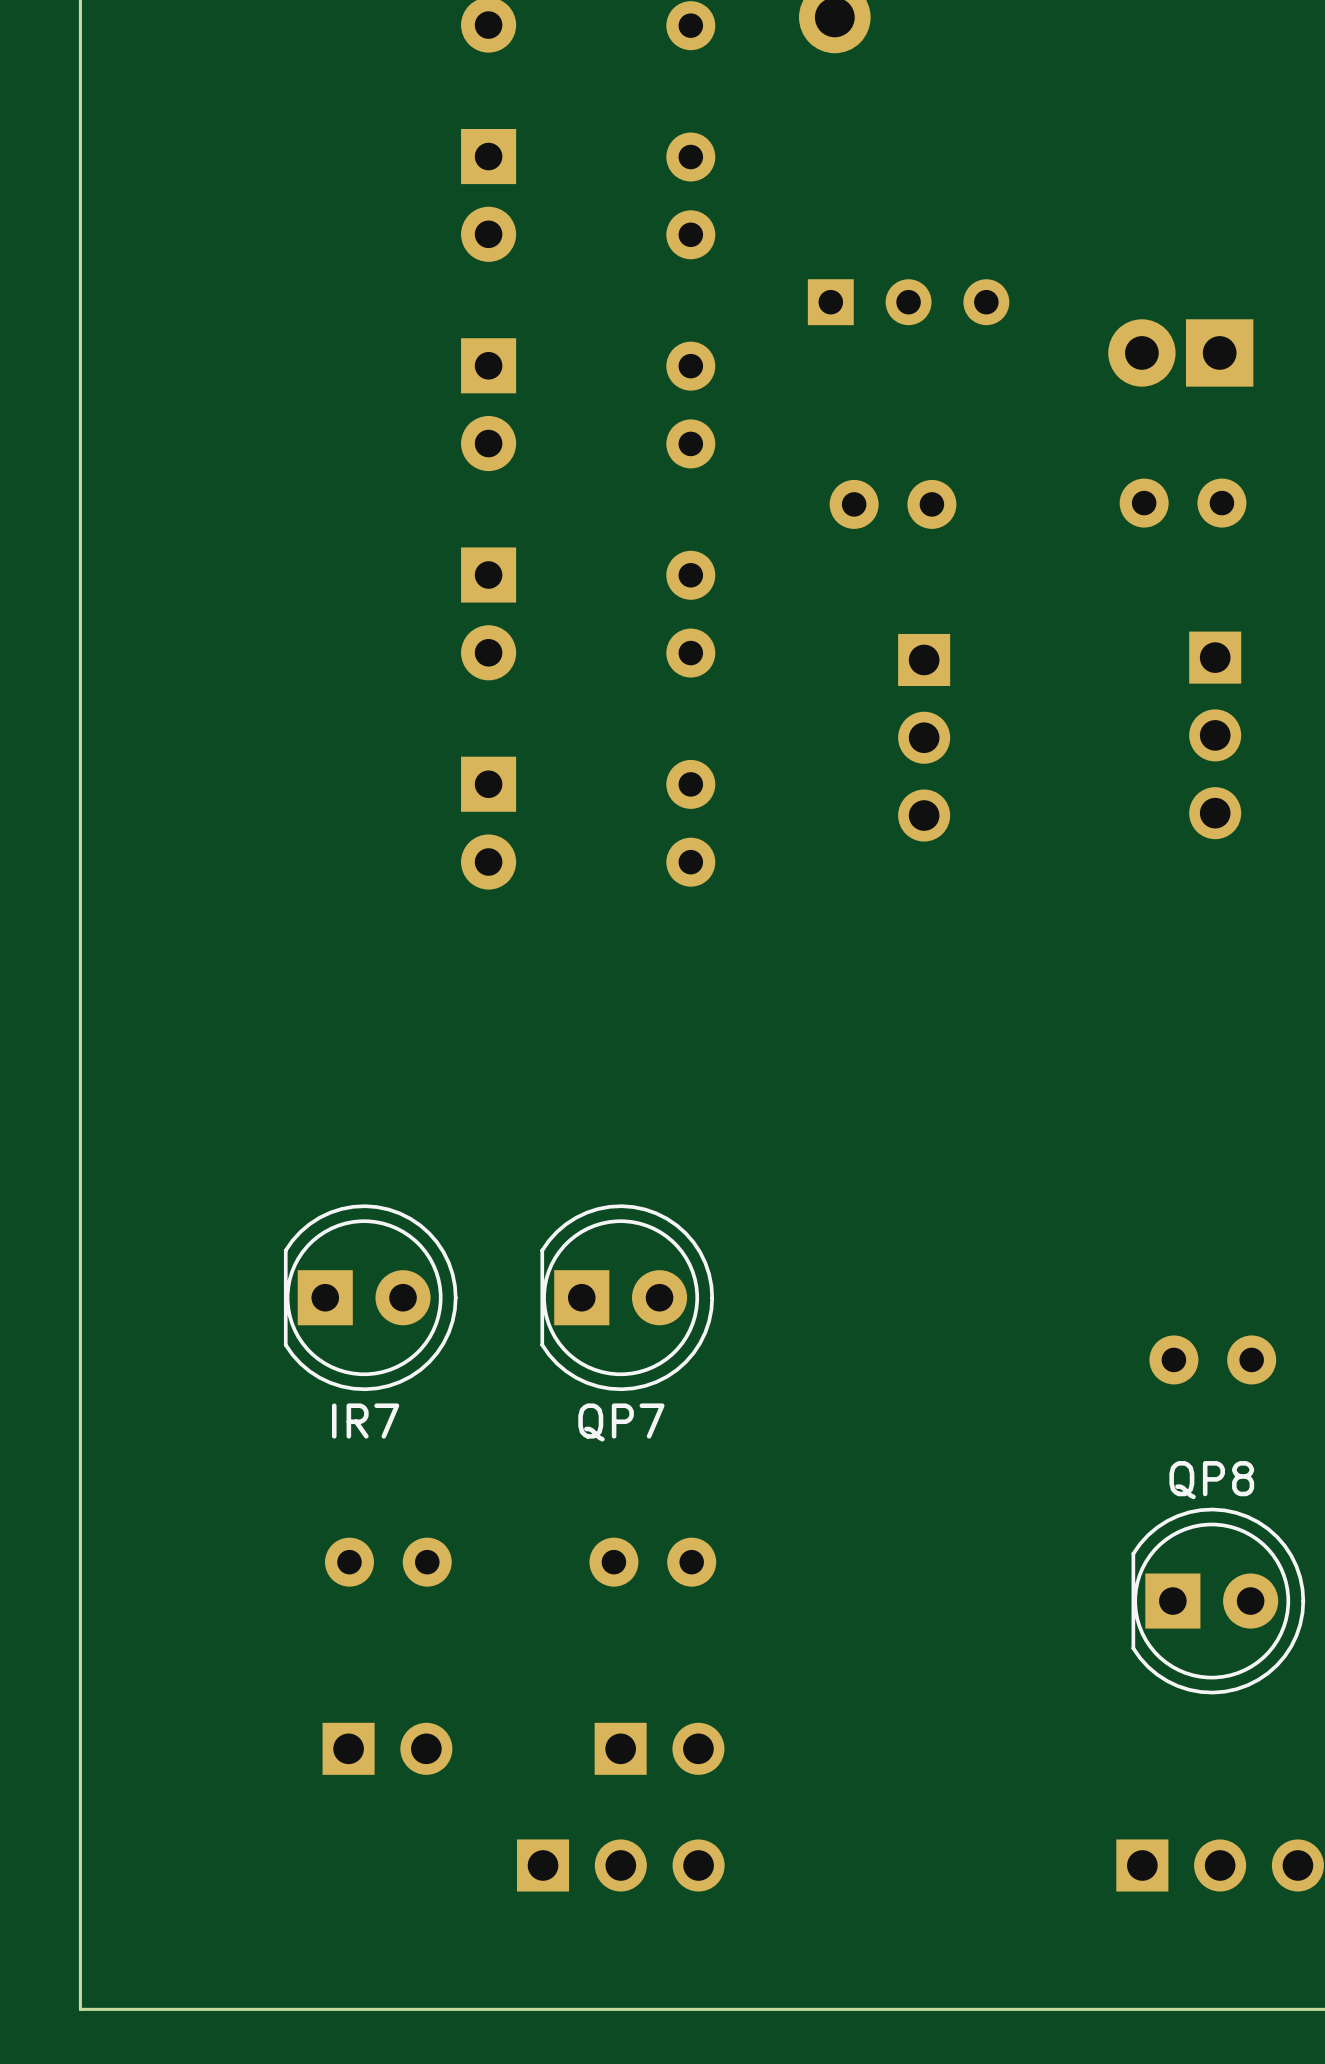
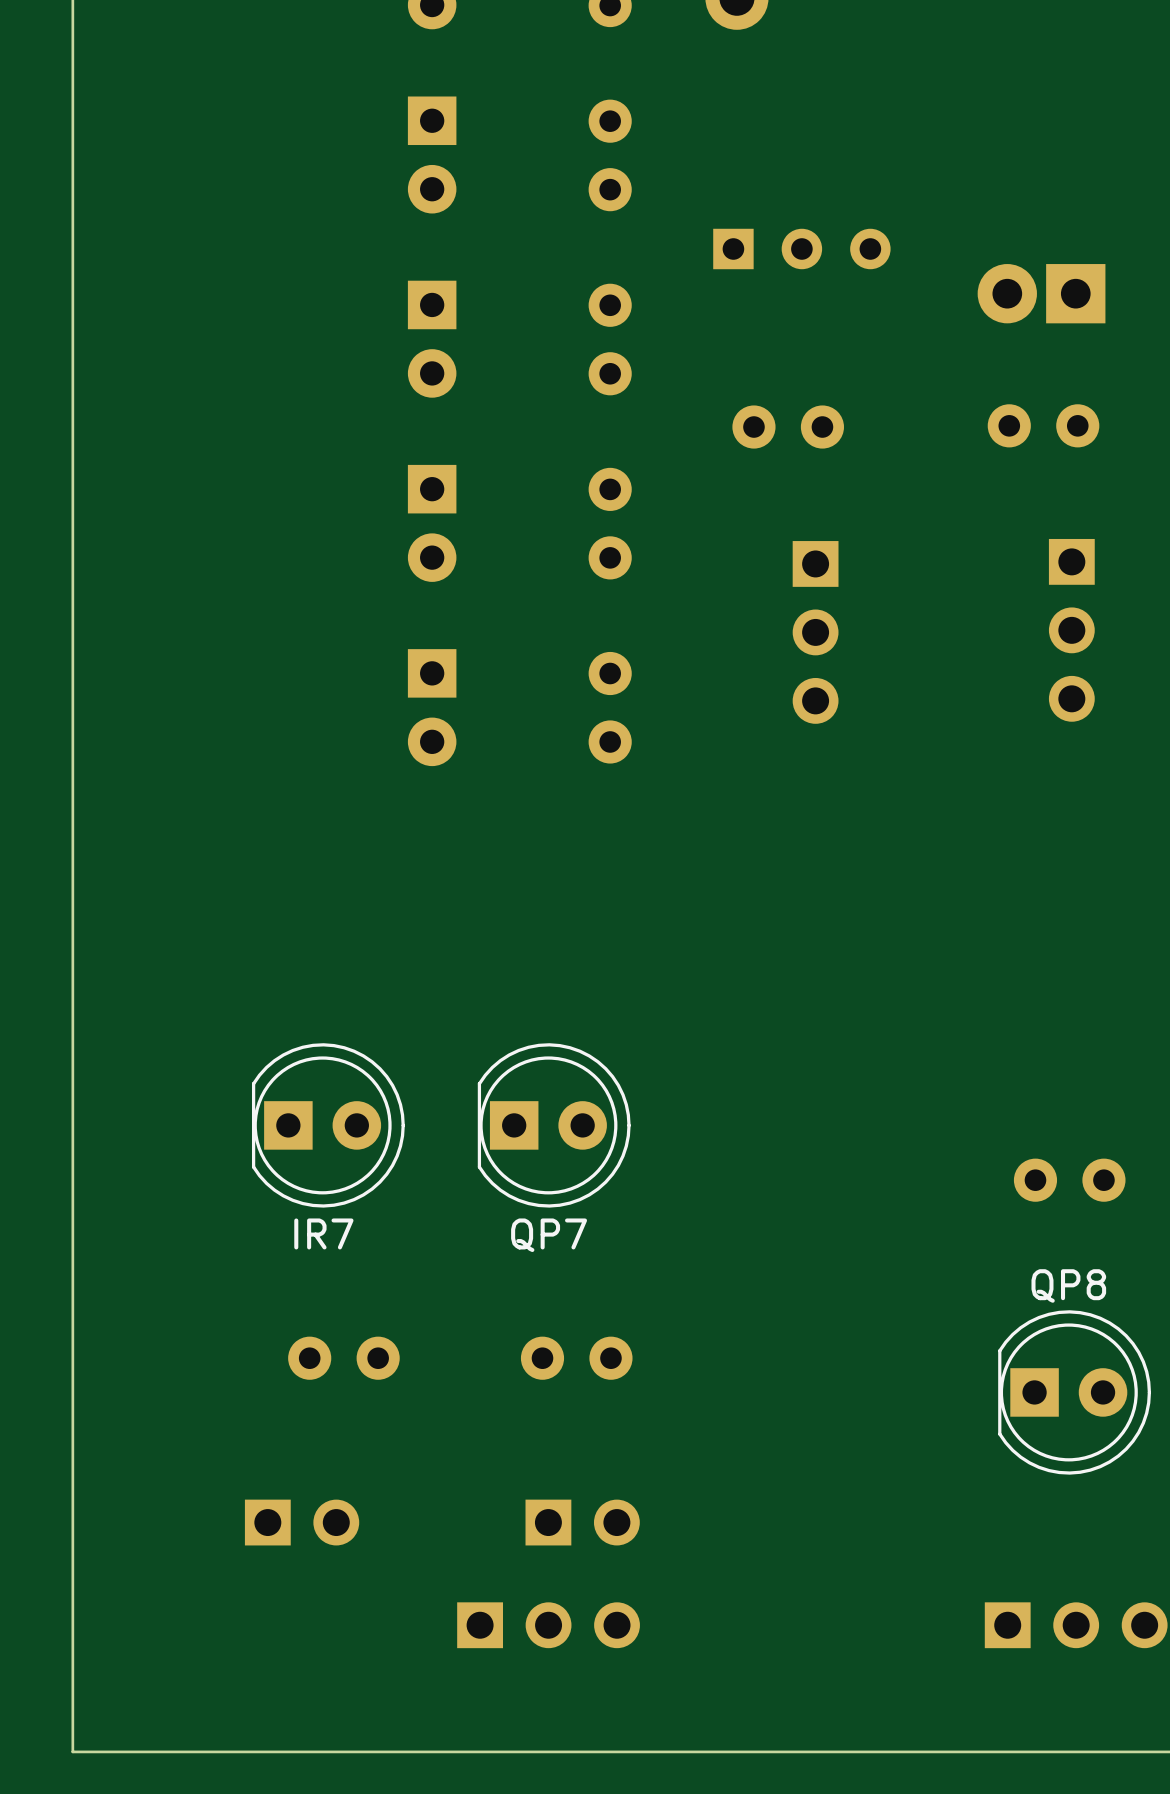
part position: (387, 1748) -> (302, 1522)

